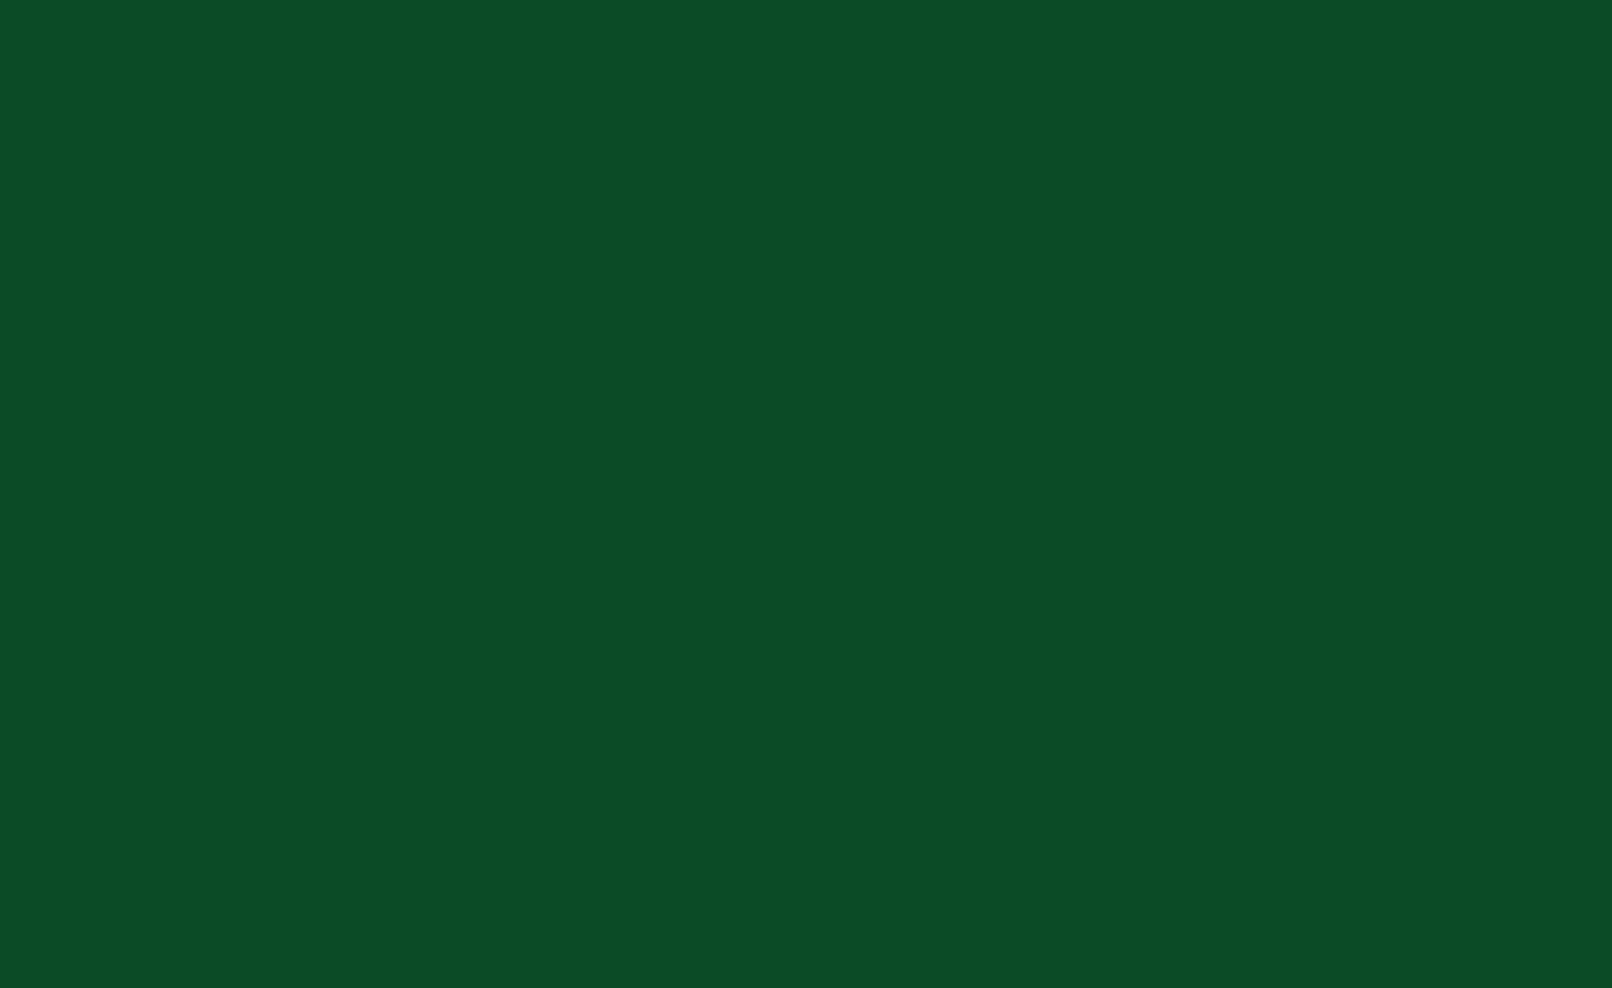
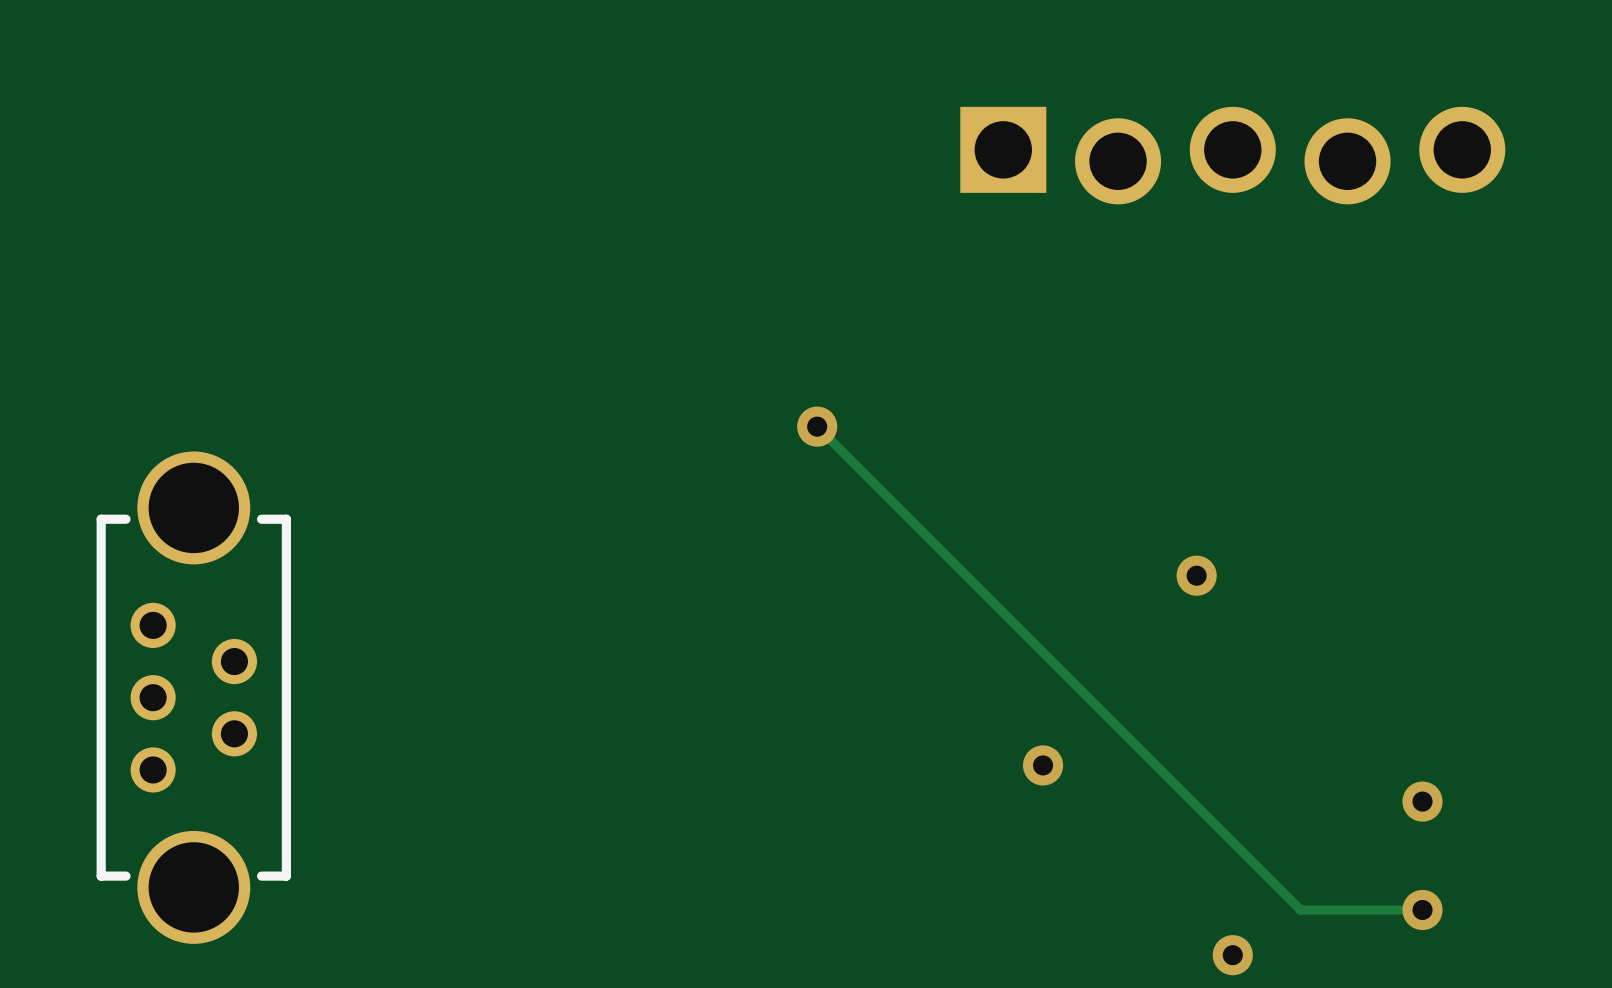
part: none -> (1232, 155)
track: none -> (817, 426) (1300, 910) (1422, 910)
via: none -> (817, 426)
via: none -> (1196, 575)
part: none -> (193, 697)
via: none -> (1043, 765)
via: none -> (1422, 801)
via: none -> (1422, 910)
via: none -> (1232, 955)

